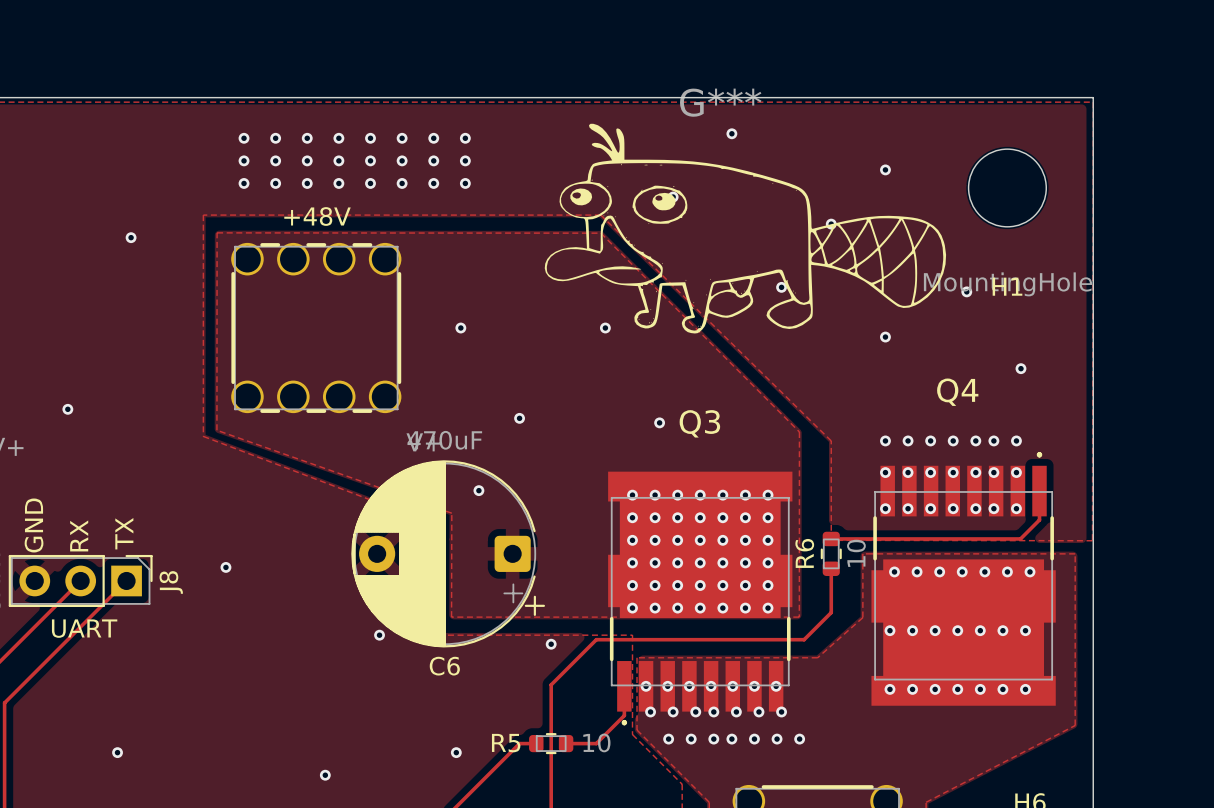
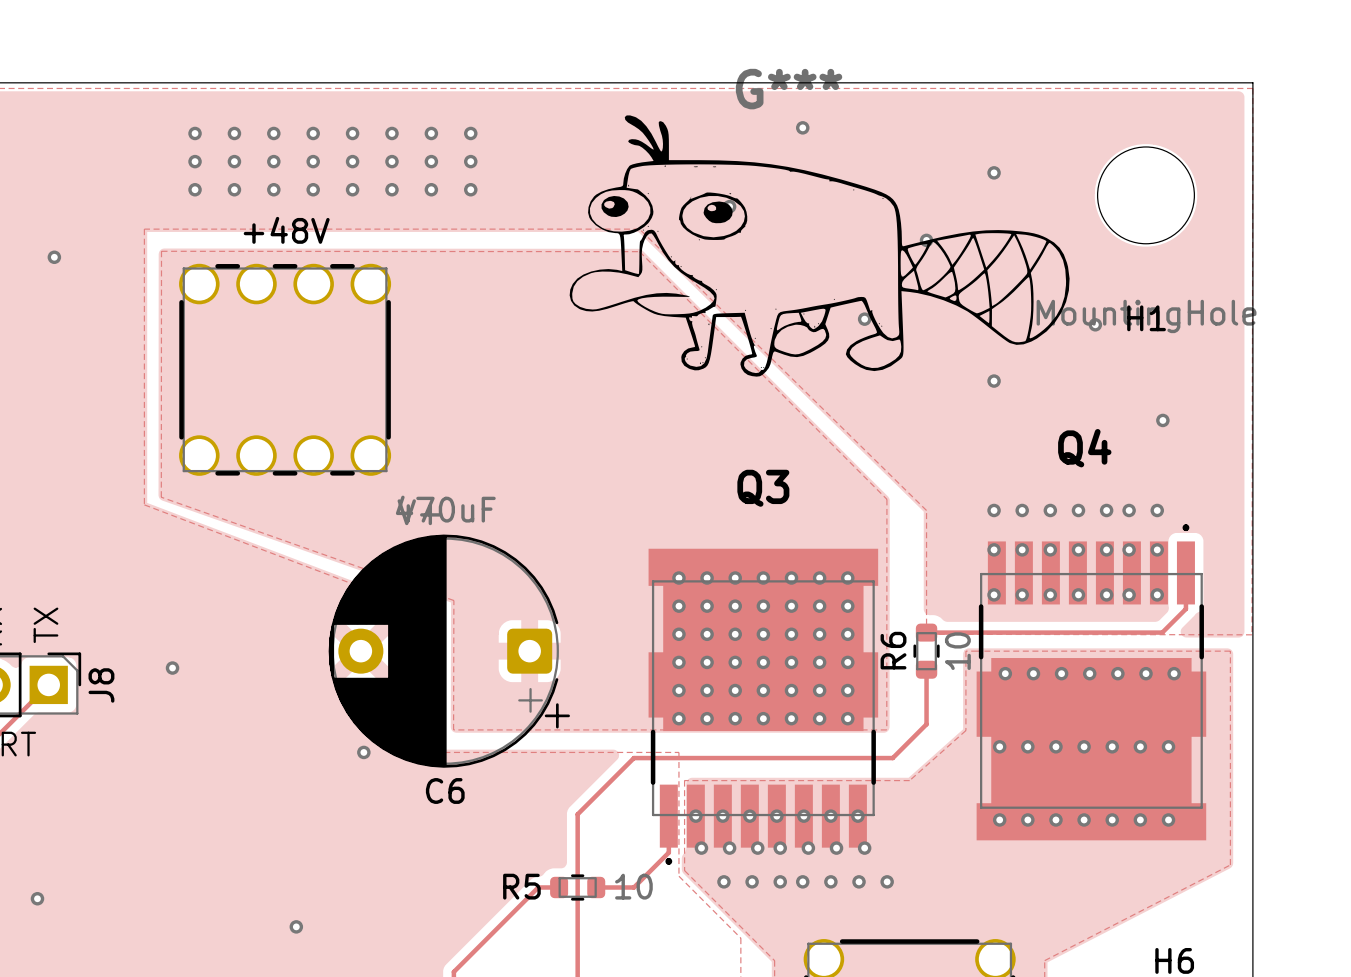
via: (460, 328) -> none
via: (605, 328) -> none
via: (519, 418) -> none
via: (659, 422) -> none
via: (478, 490) -> none
via: (551, 644) -> none
via: (456, 752) -> none

